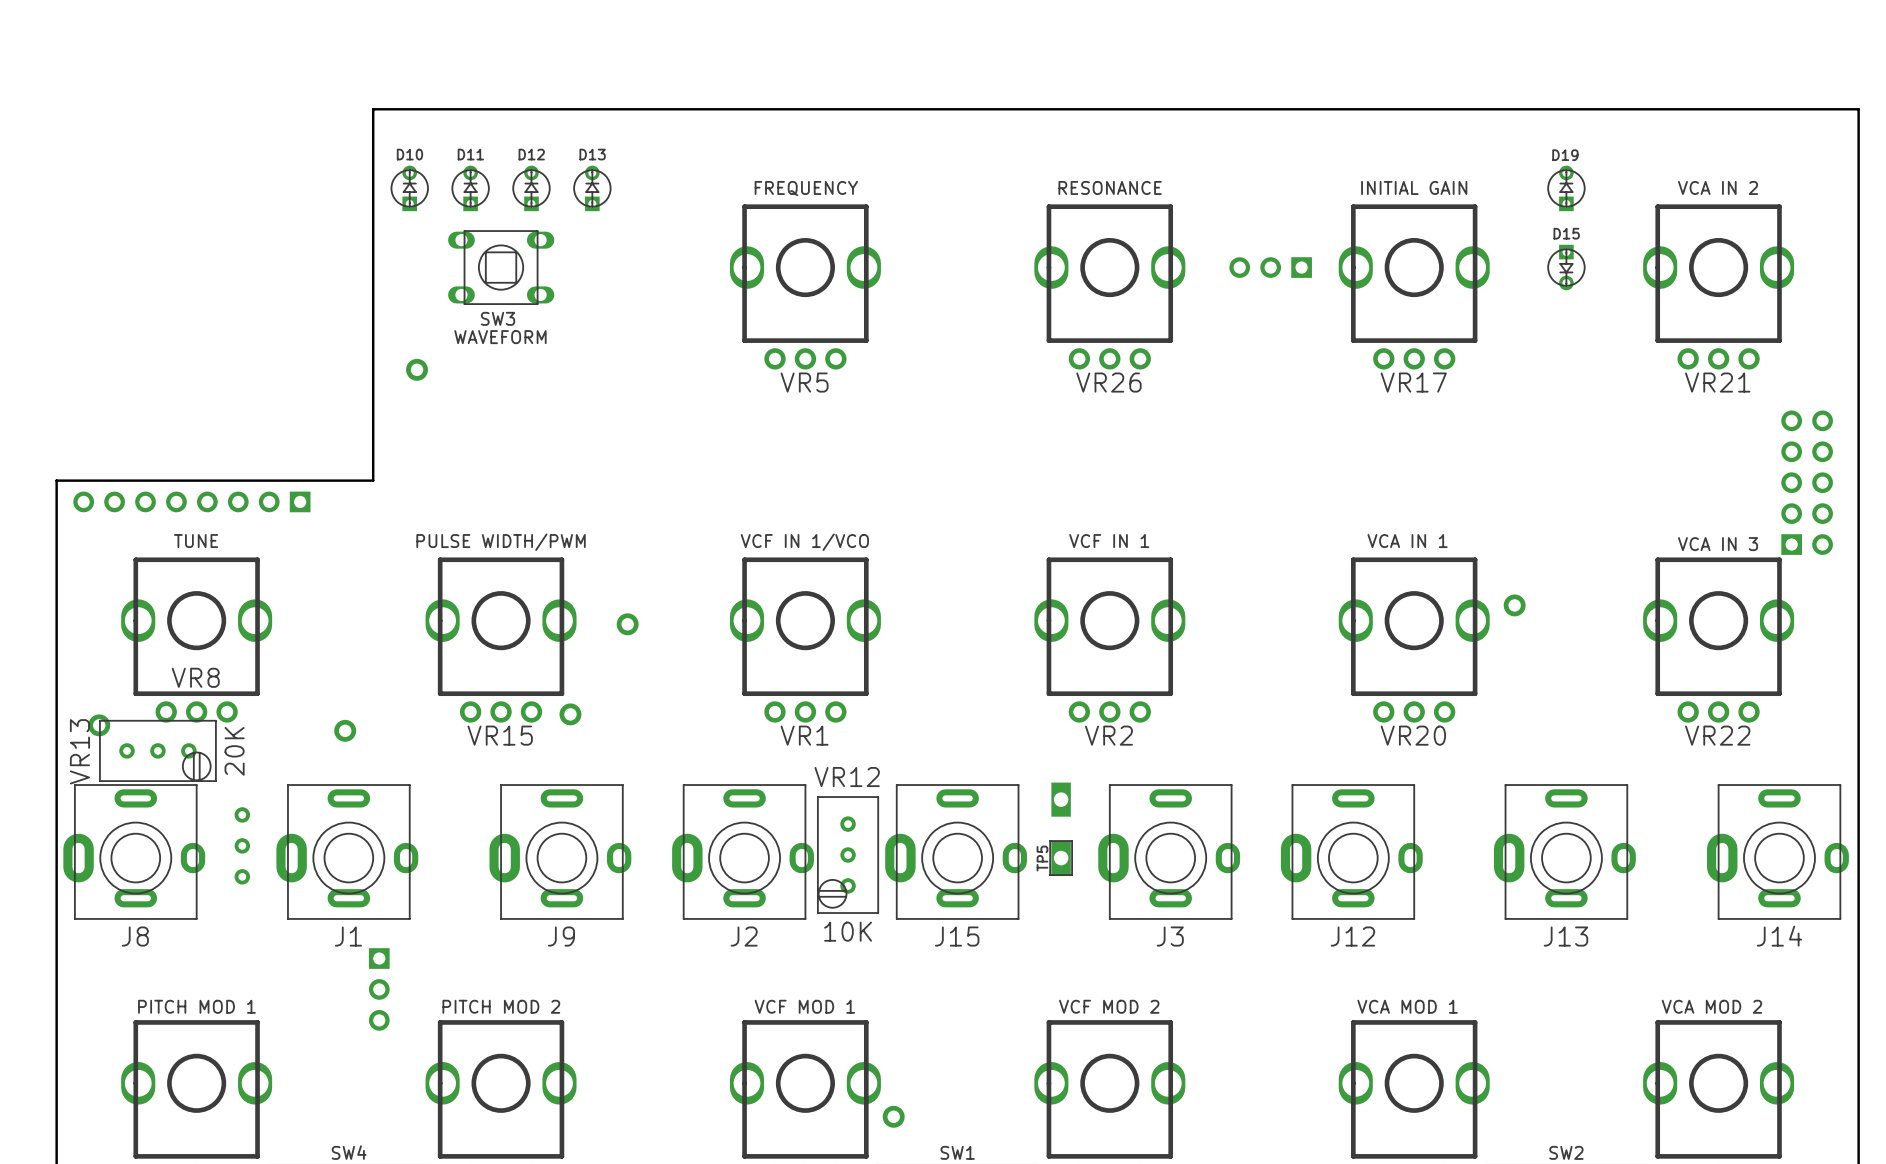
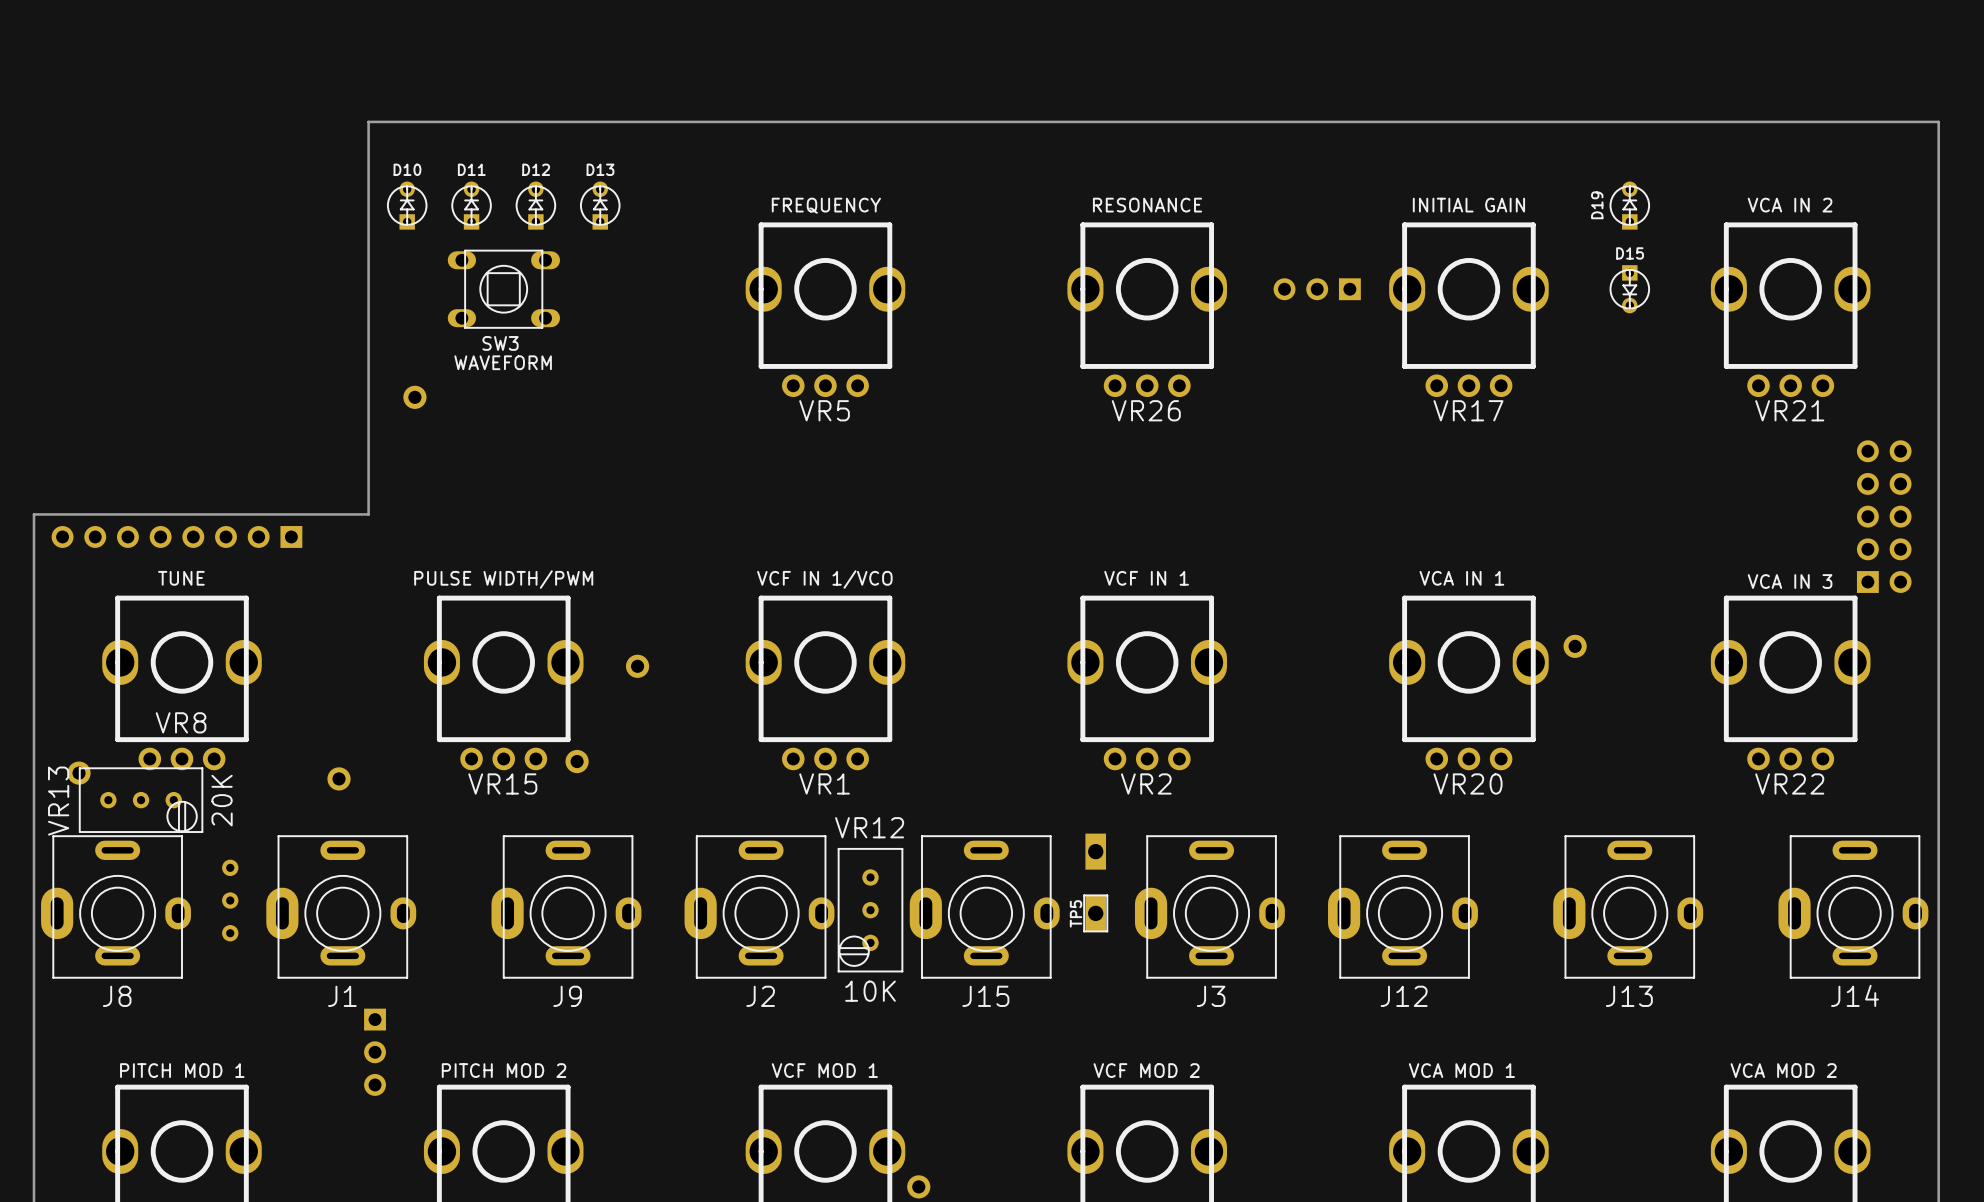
D19 name rotation: 0° (1565, 155) -> 90° counterclockwise (1597, 205)
D19 name position: D19 (1565, 155) -> D19 (1597, 205)

